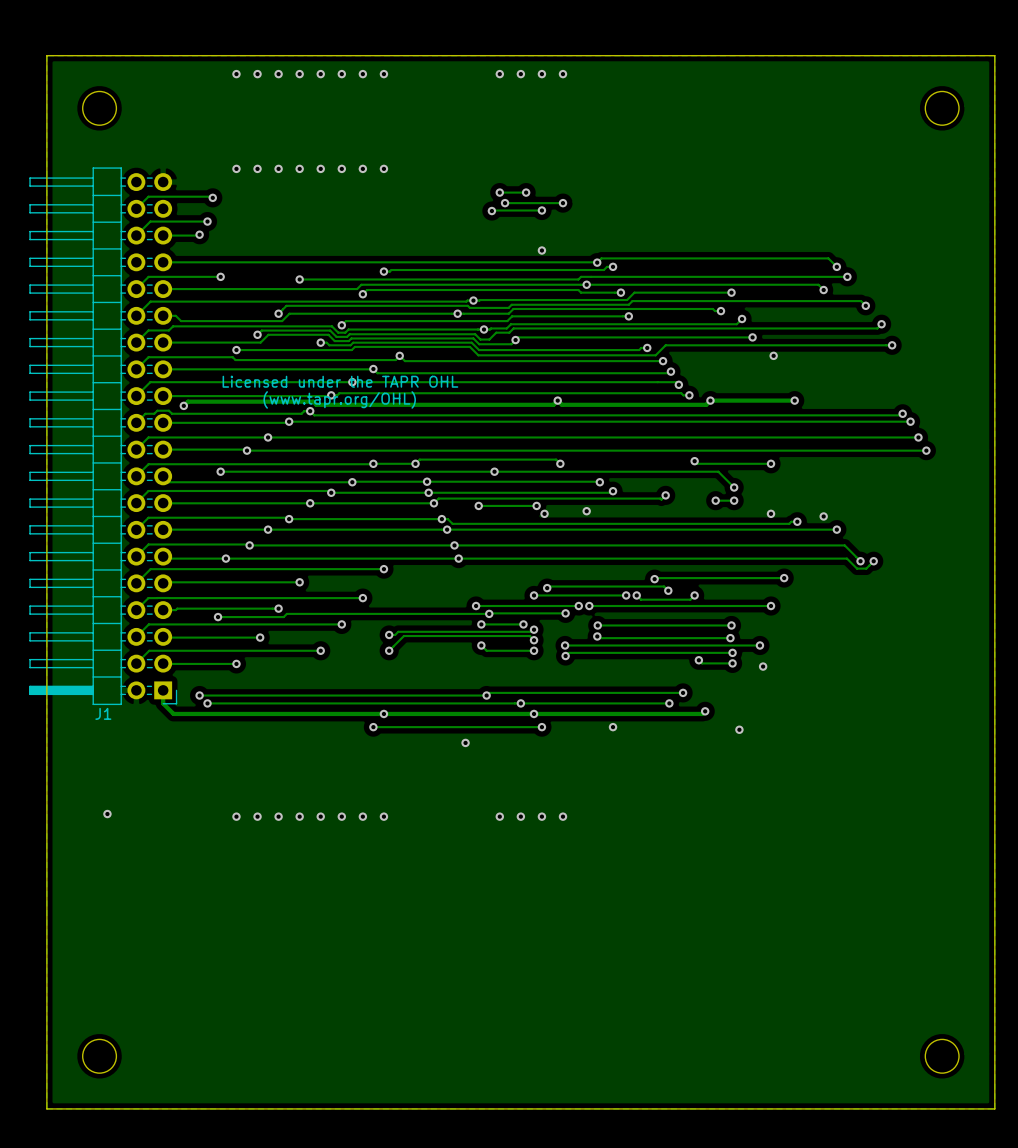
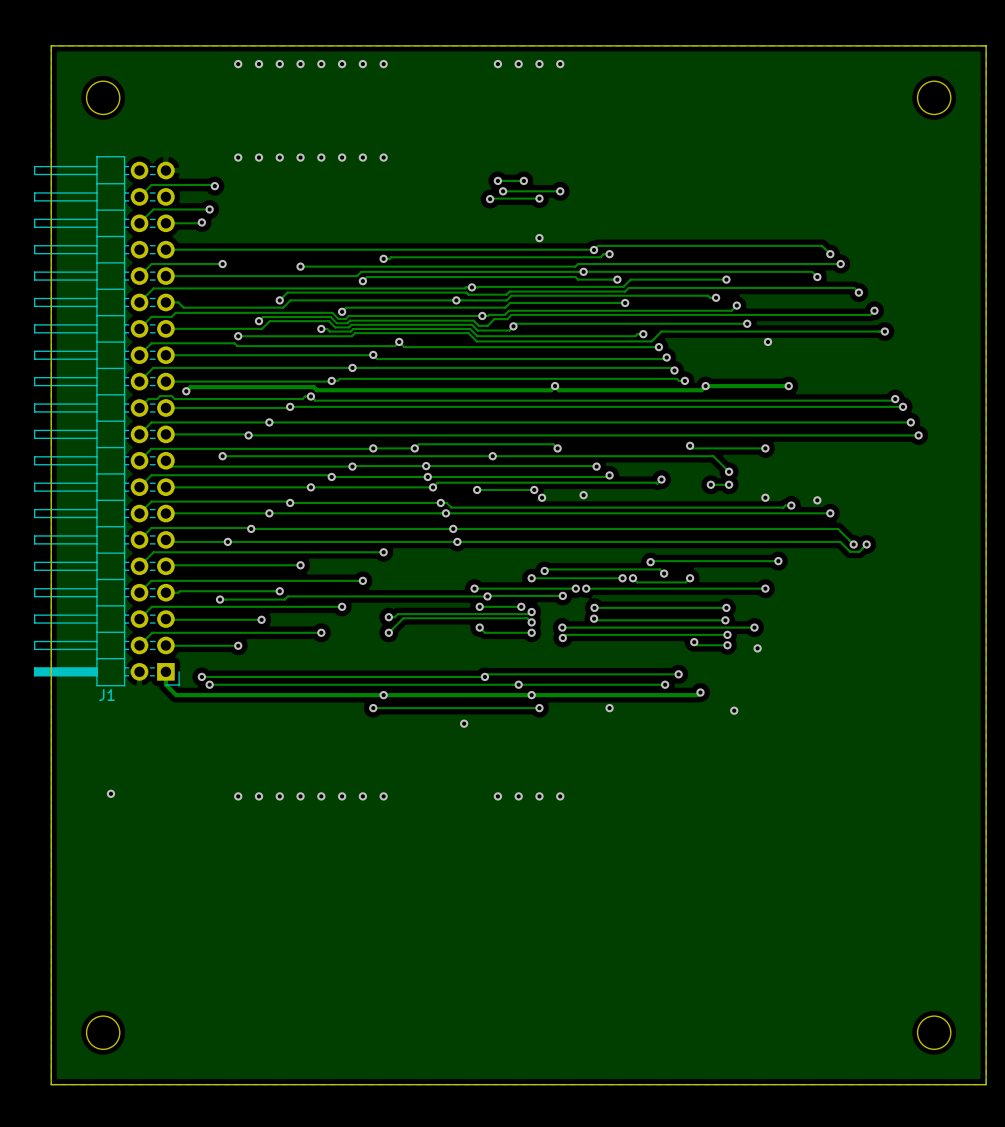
text: Licensed under the TAPR OHL (340, 381) -> none
text: (www.tapr.org/OHL) (339, 399) -> none

